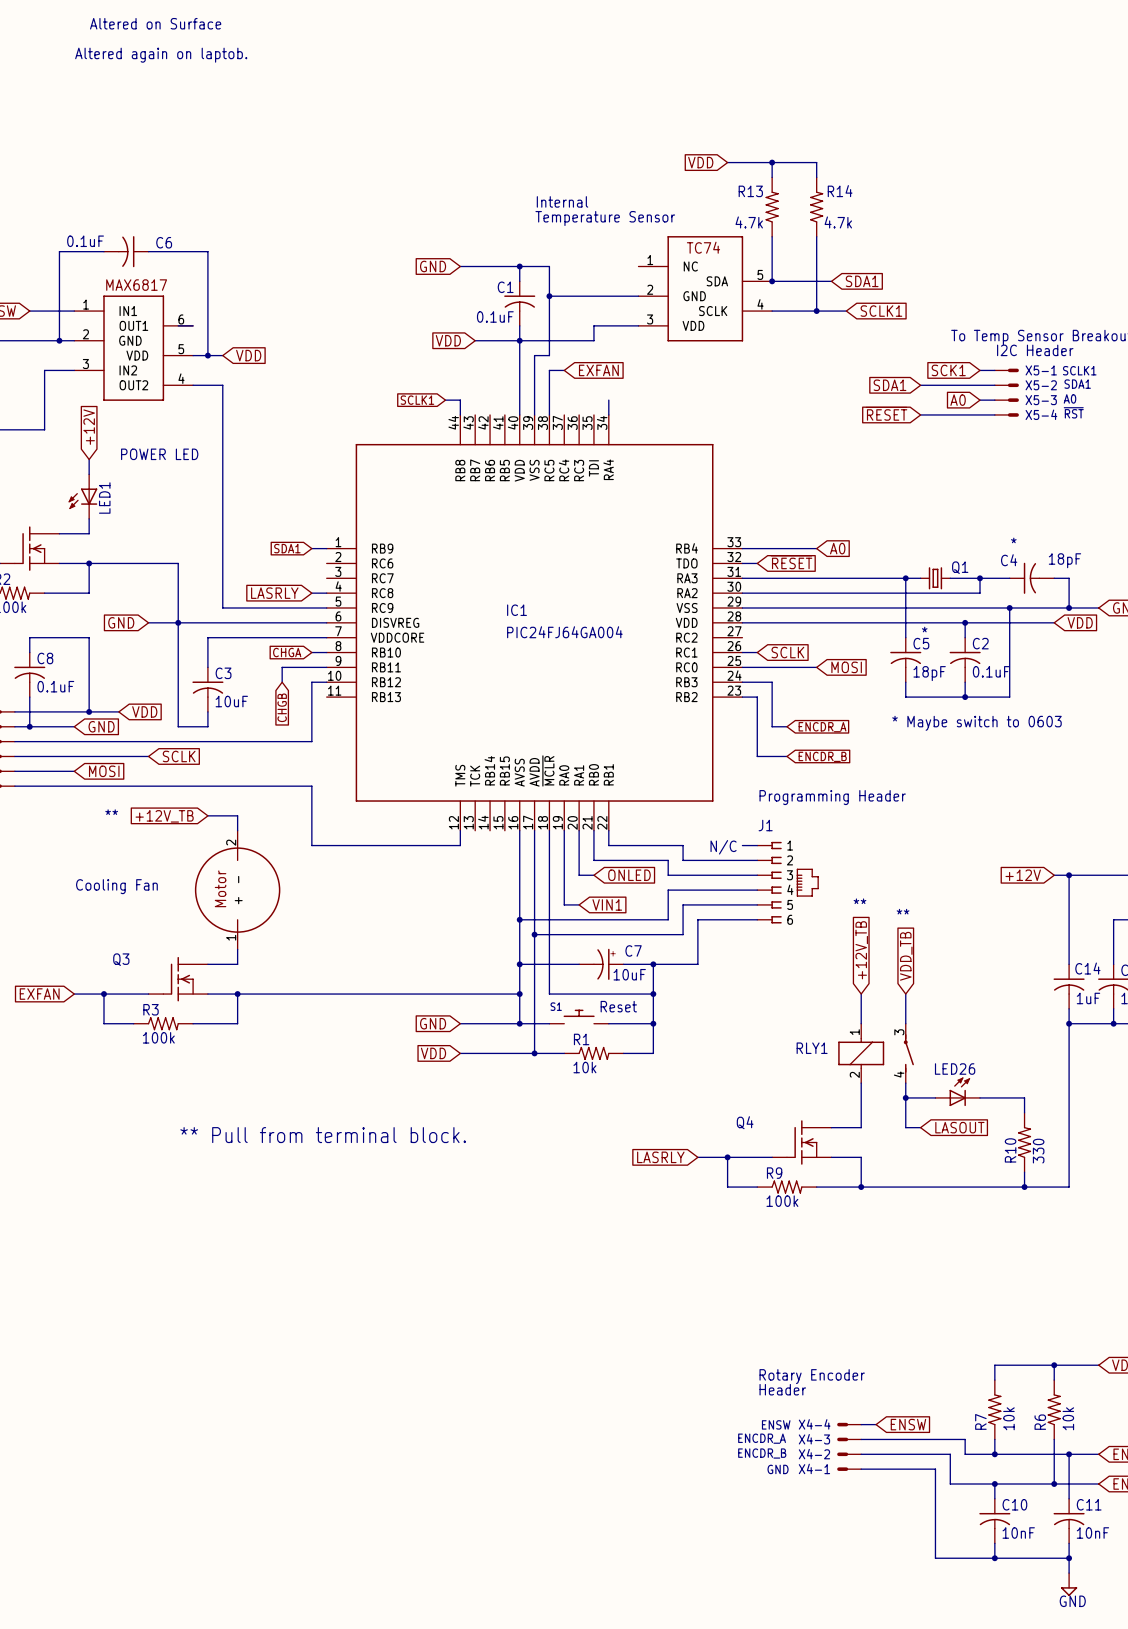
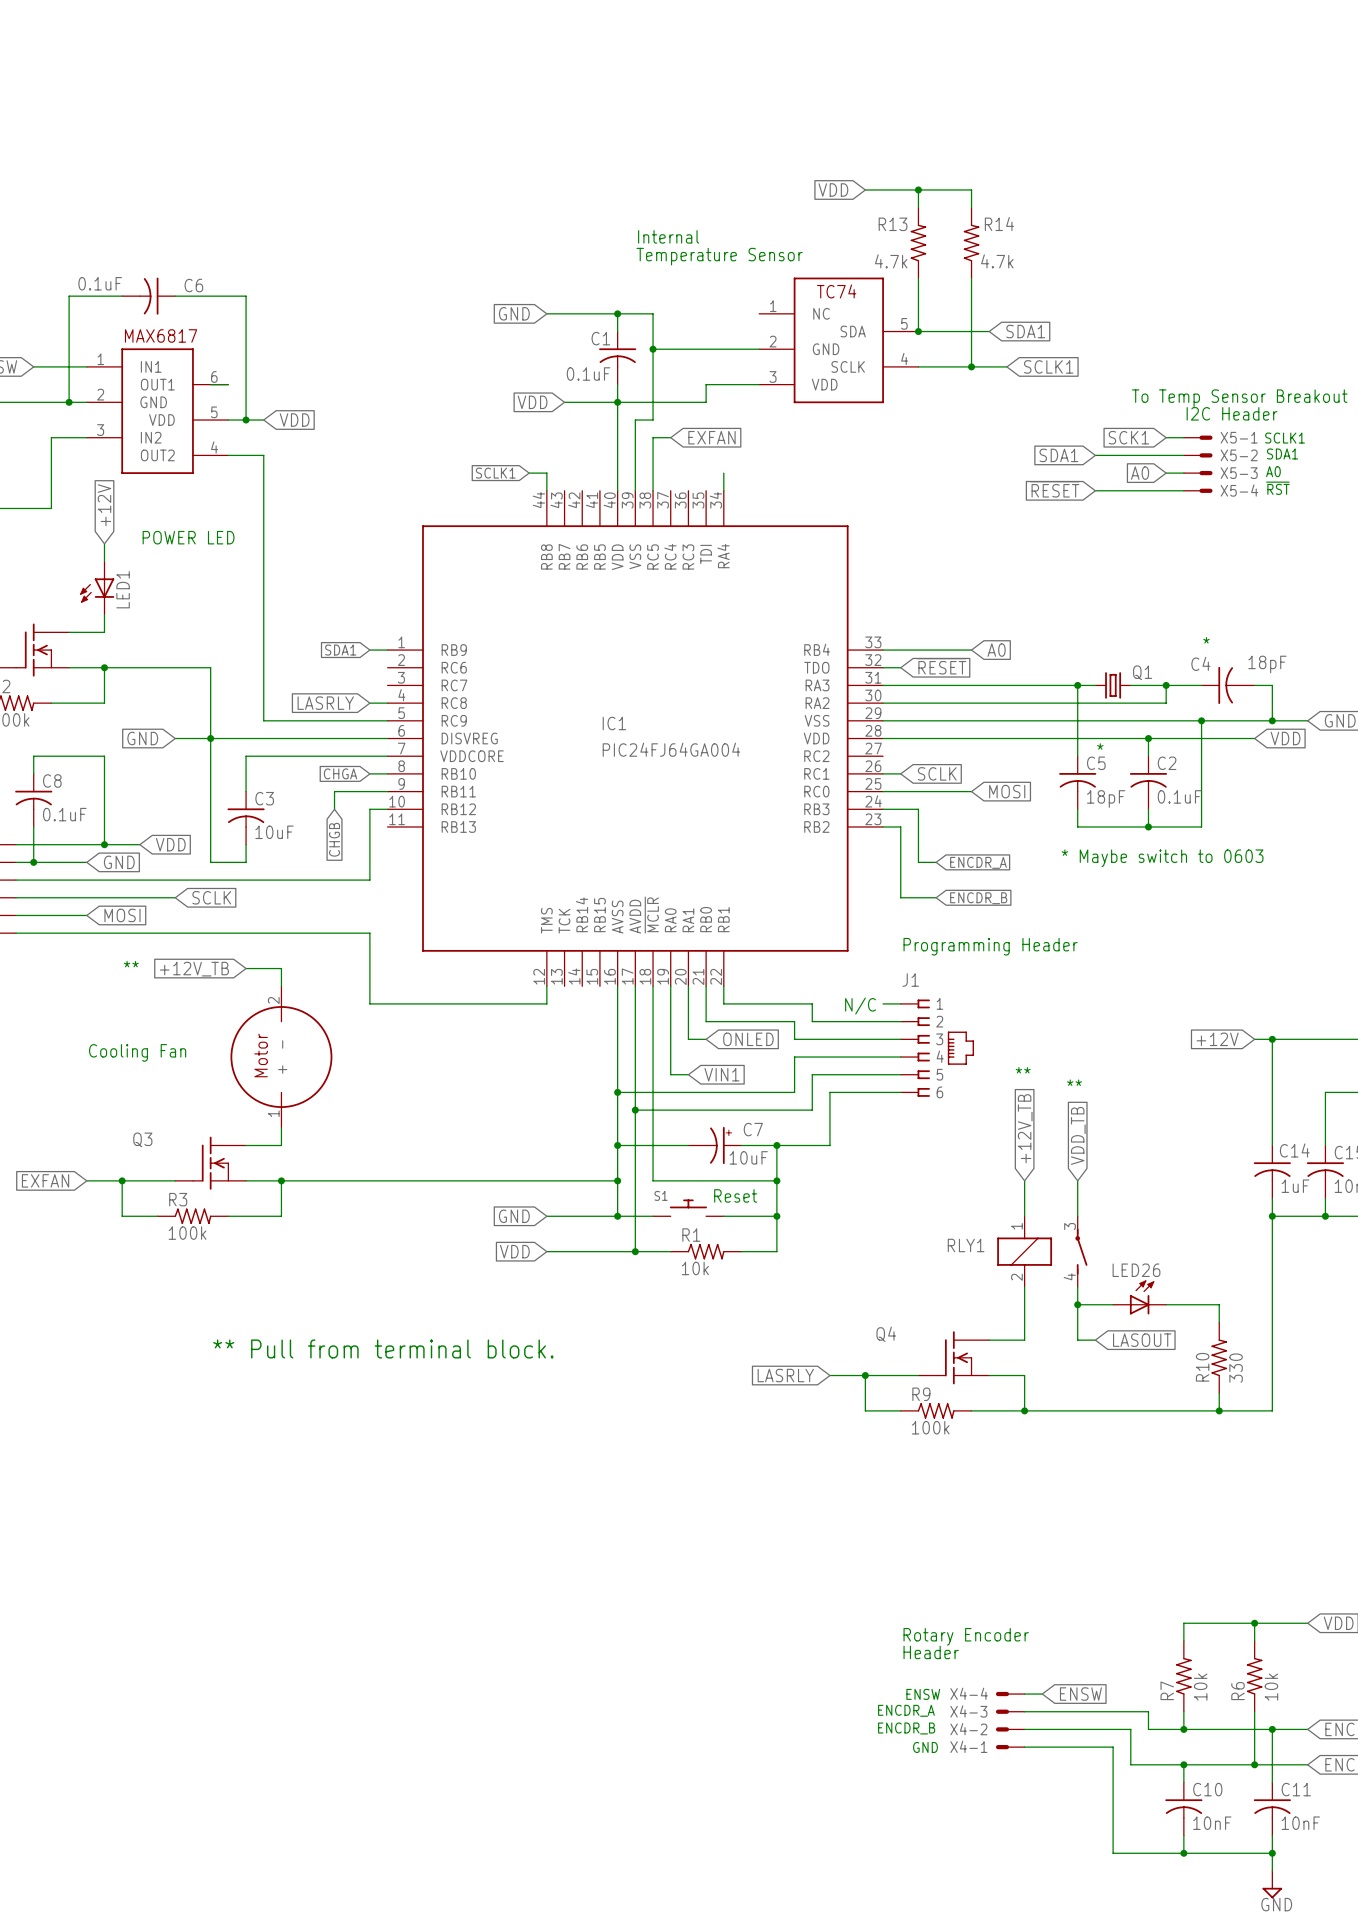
text: Altered on Surface (155, 23) -> none
text: Altered again on laptob. (161, 55) -> none

